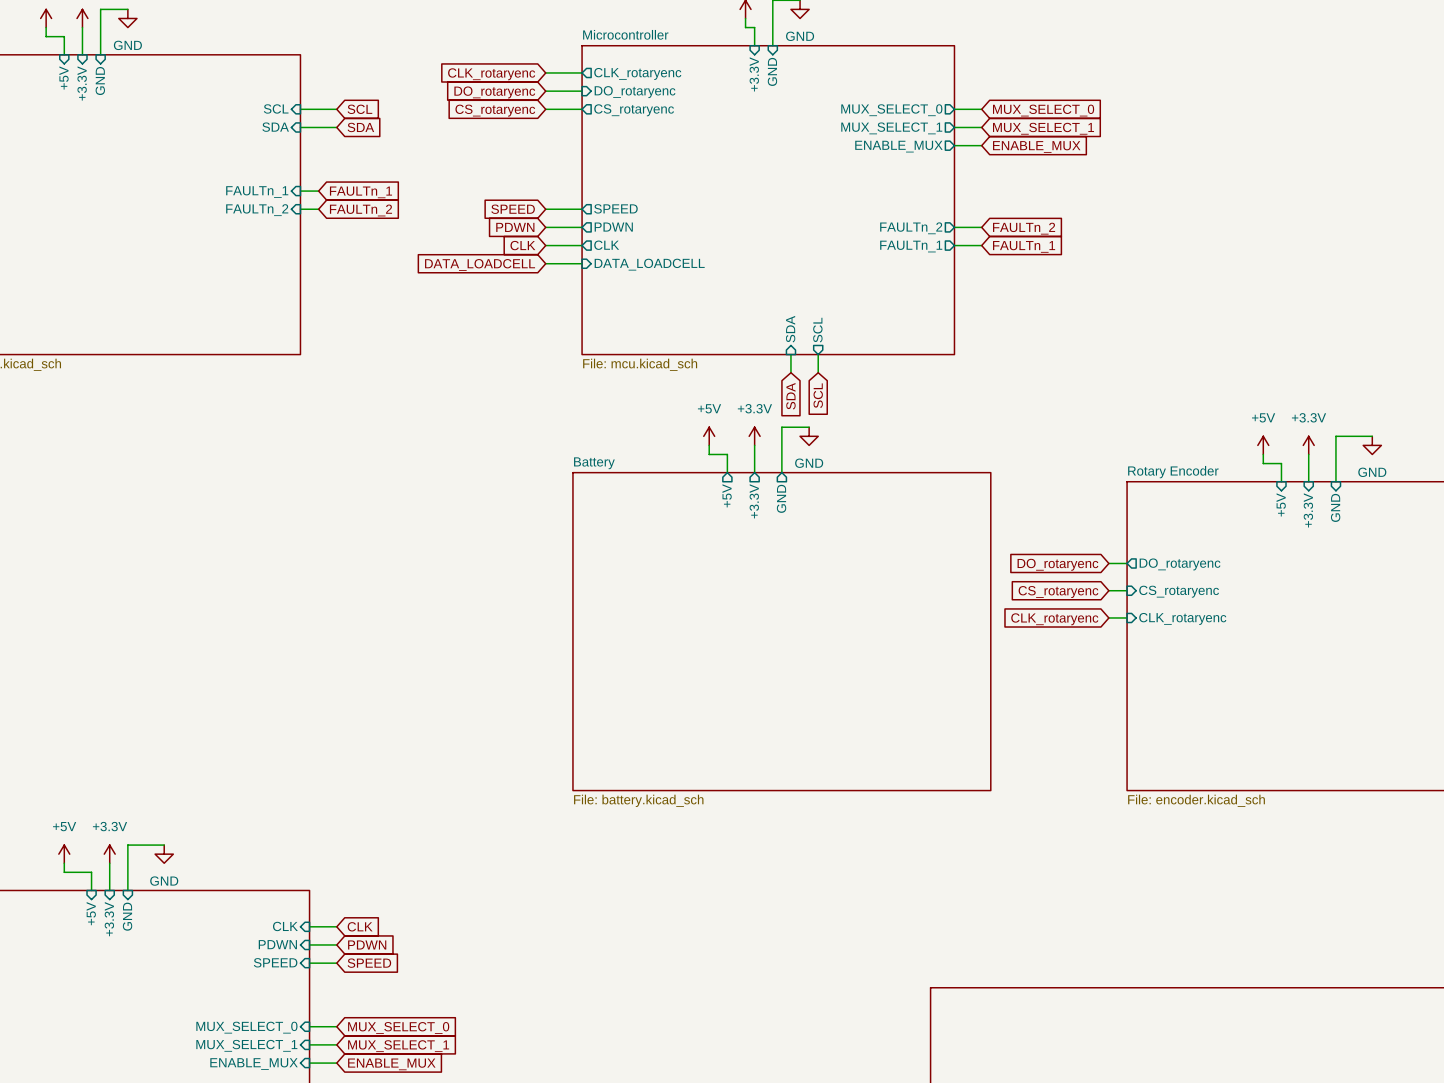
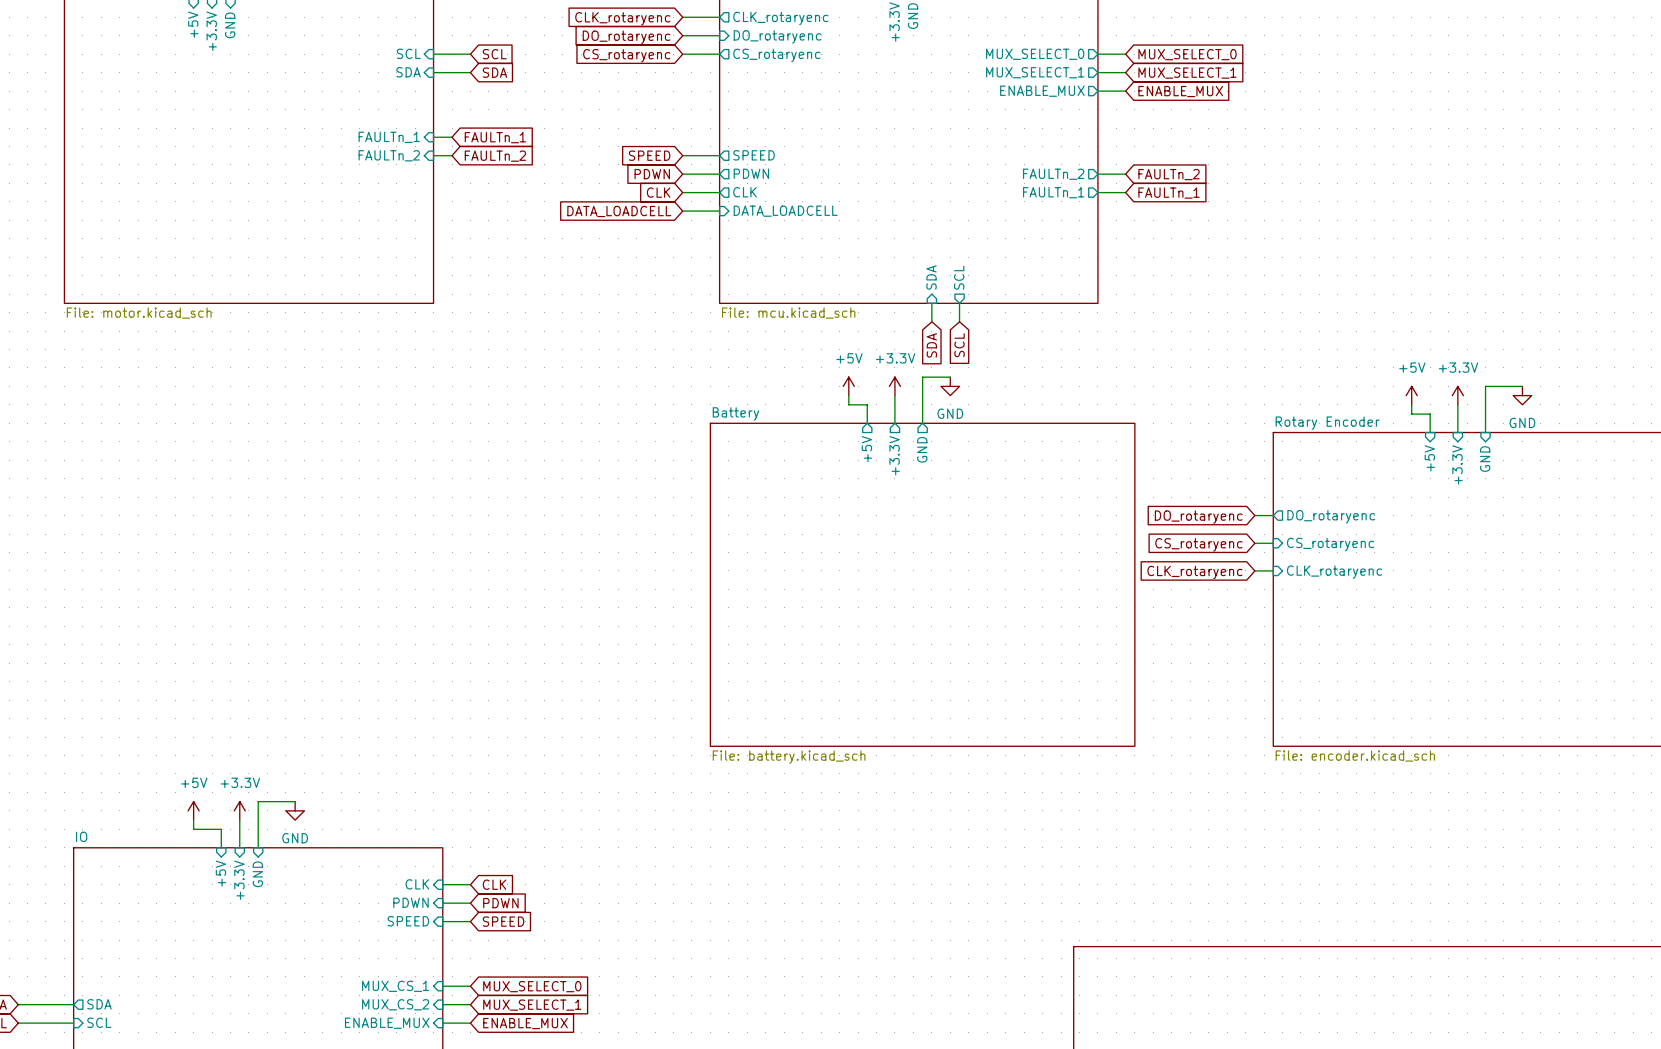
sheet pin: MUX_SELECT_0 (246, 1027) -> MUX_CS_1 (395, 986)
sheet pin: MUX_SELECT_1 (246, 1045) -> MUX_CS_2 (395, 1004)

